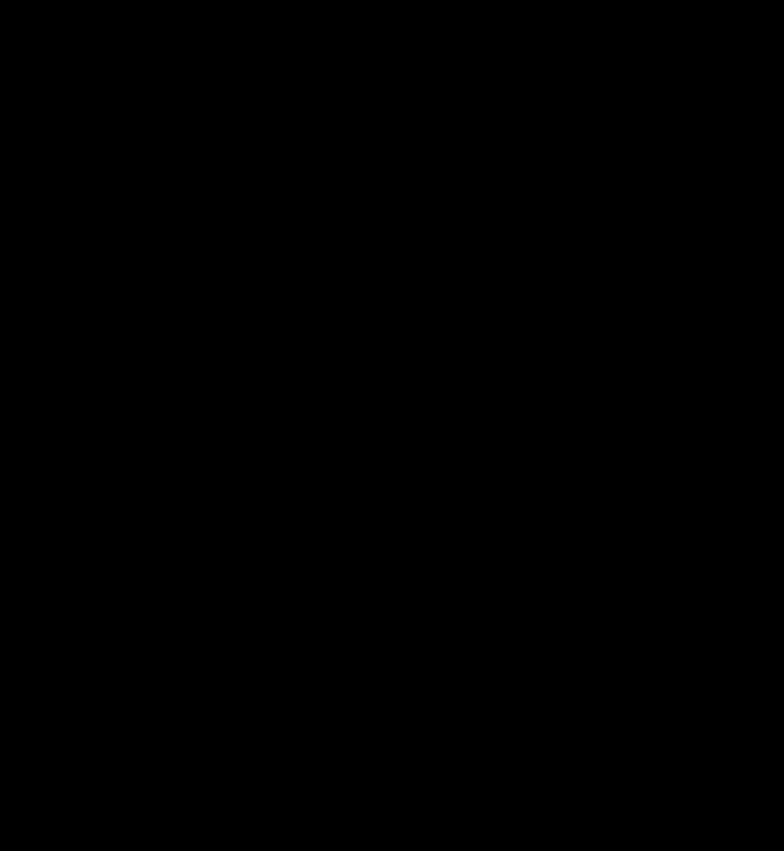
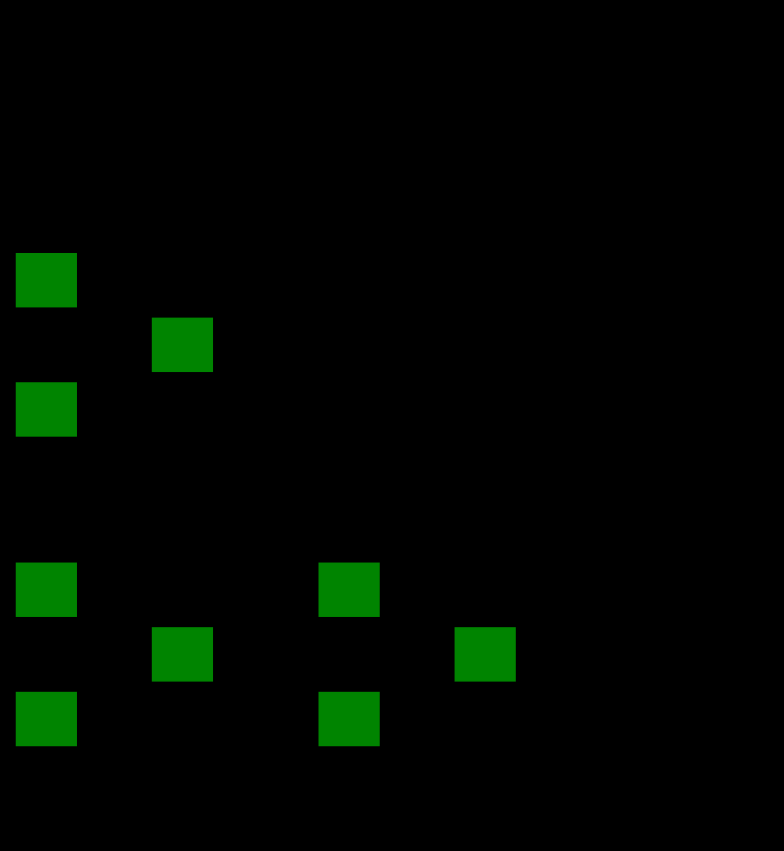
part: none -> (114, 344)
part: none -> (114, 654)
part: none -> (417, 654)

